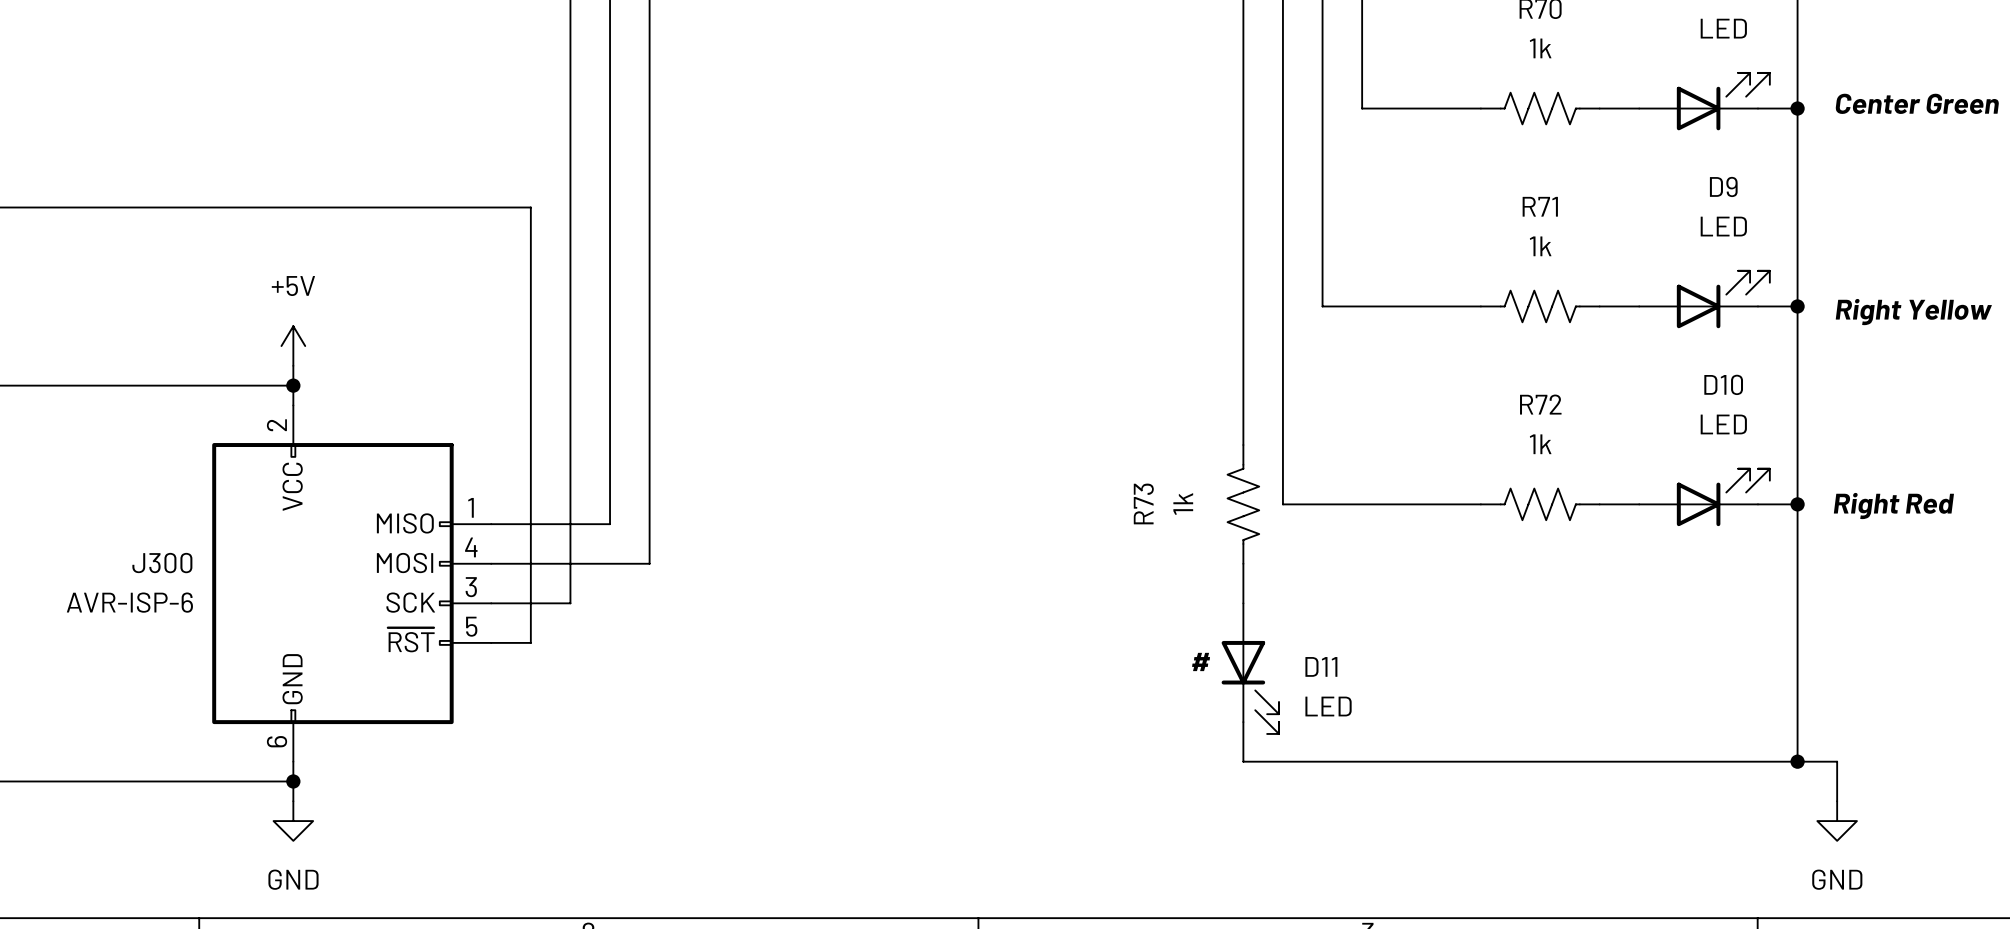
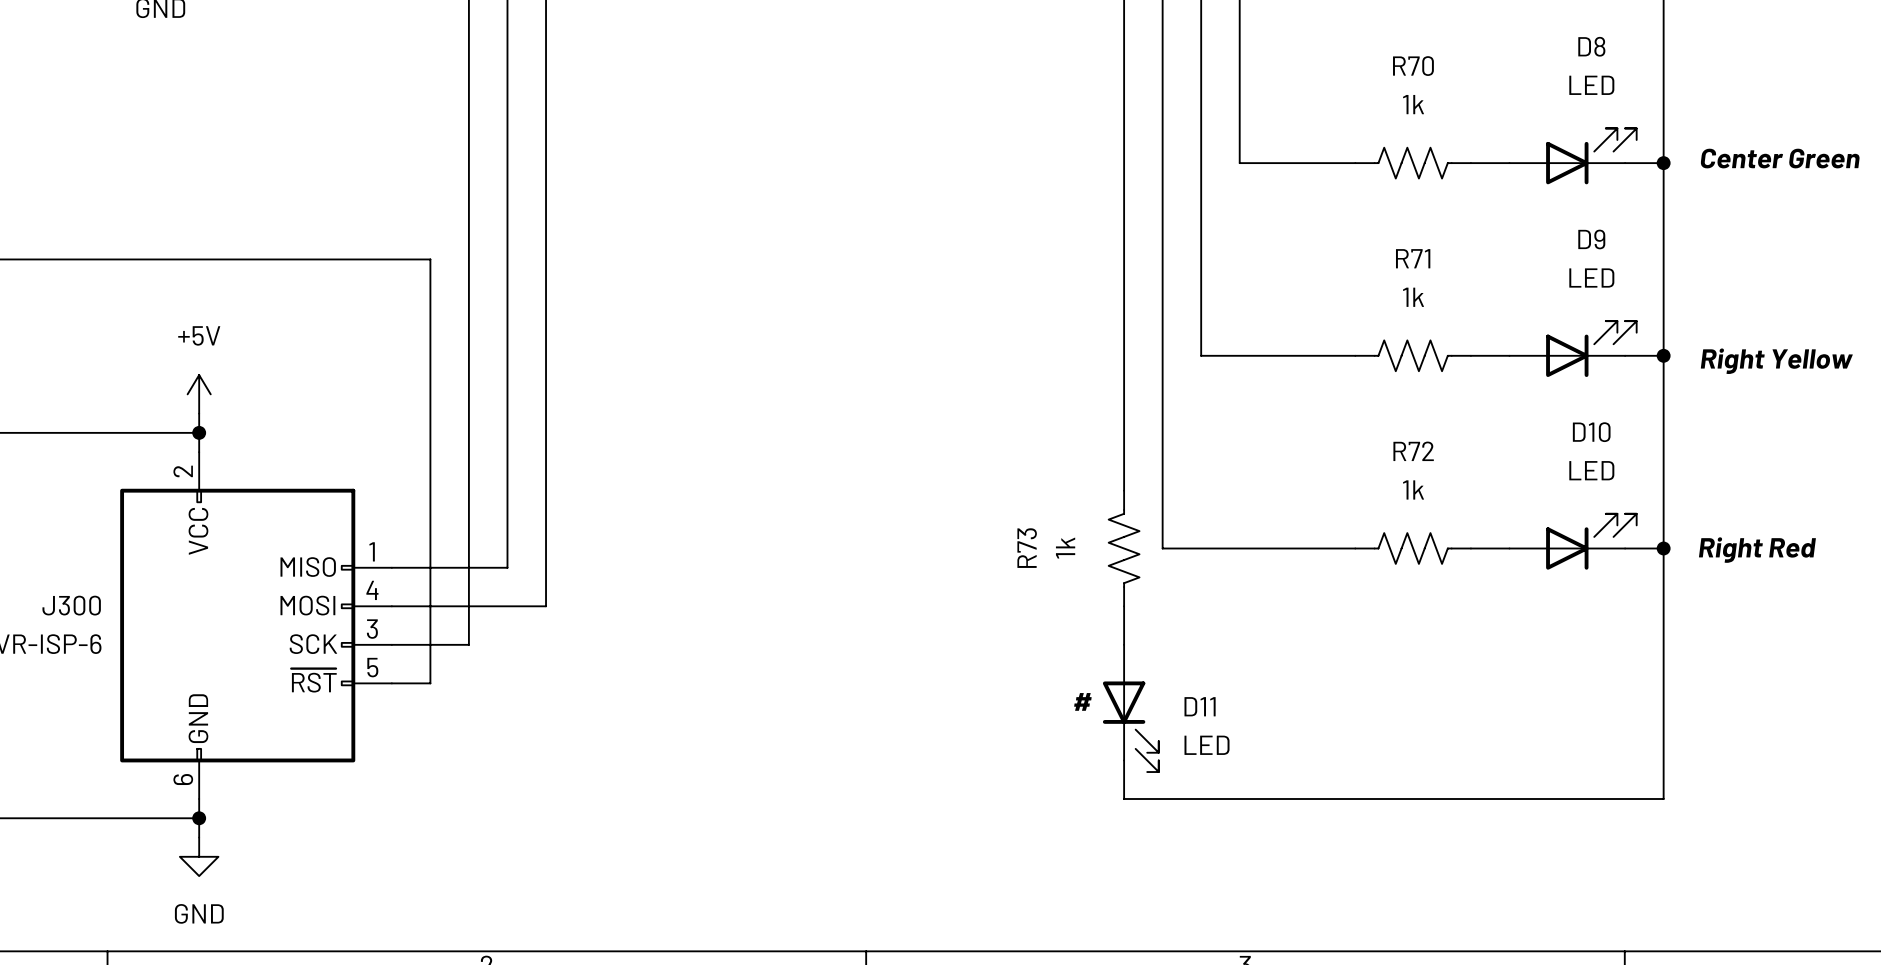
wire: (1797, 761) (1837, 761) (1837, 801) -> none
junction: (1797, 761) -> none
power symbol: GND (1837, 821) -> none

